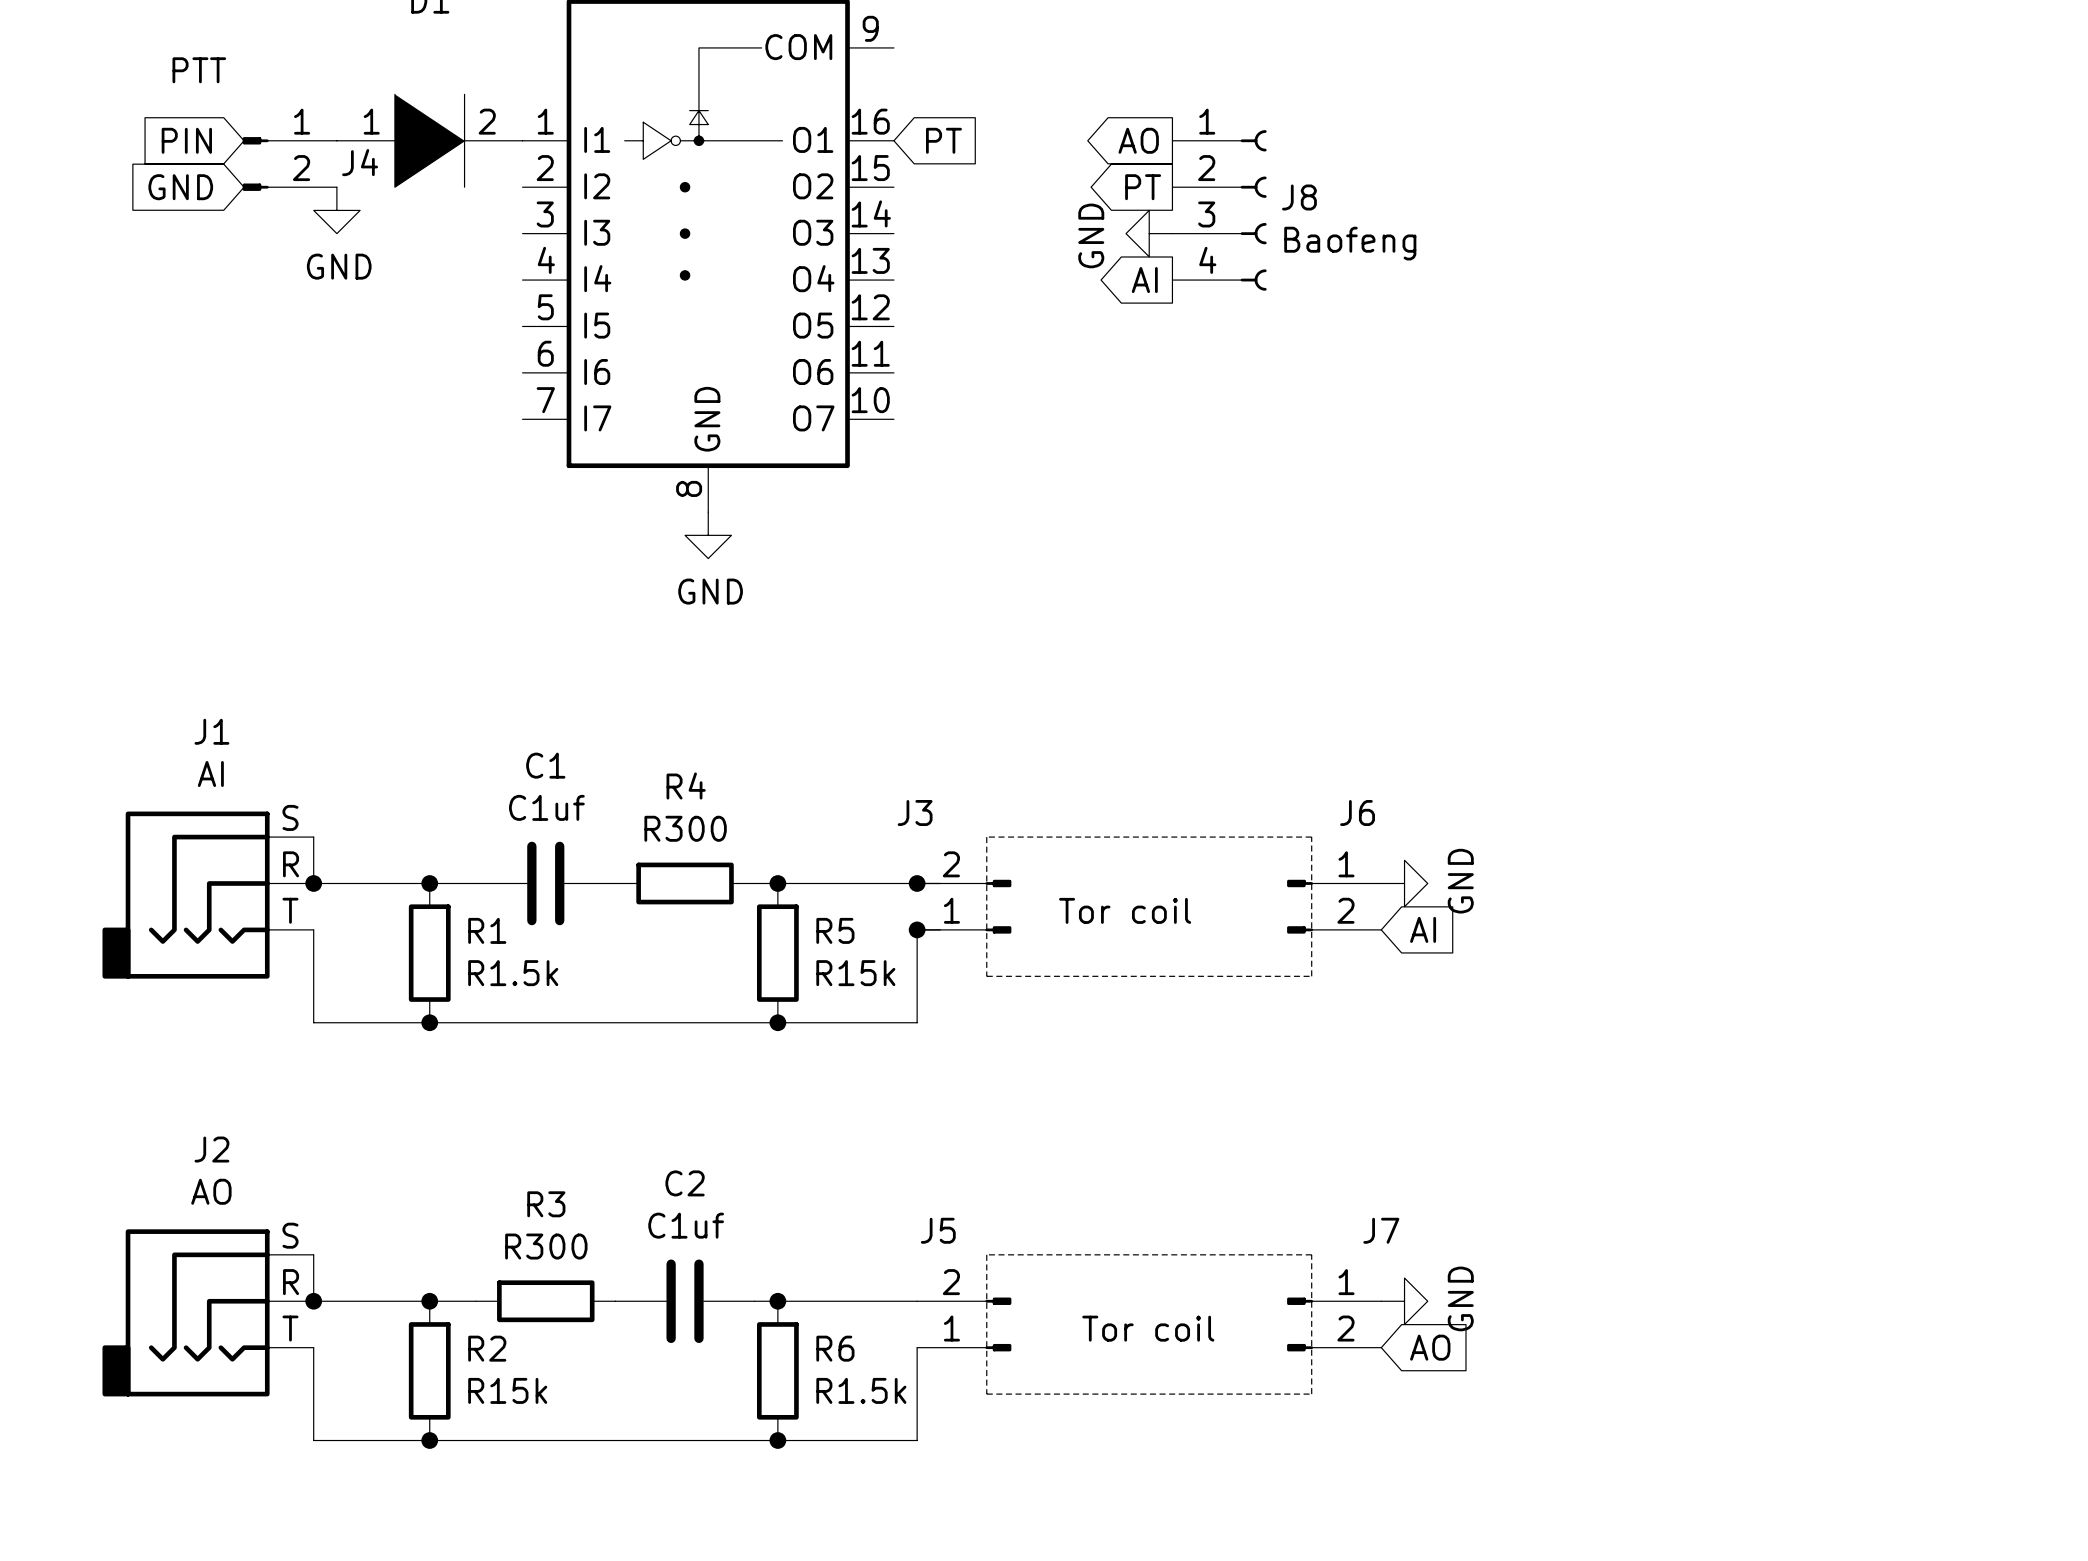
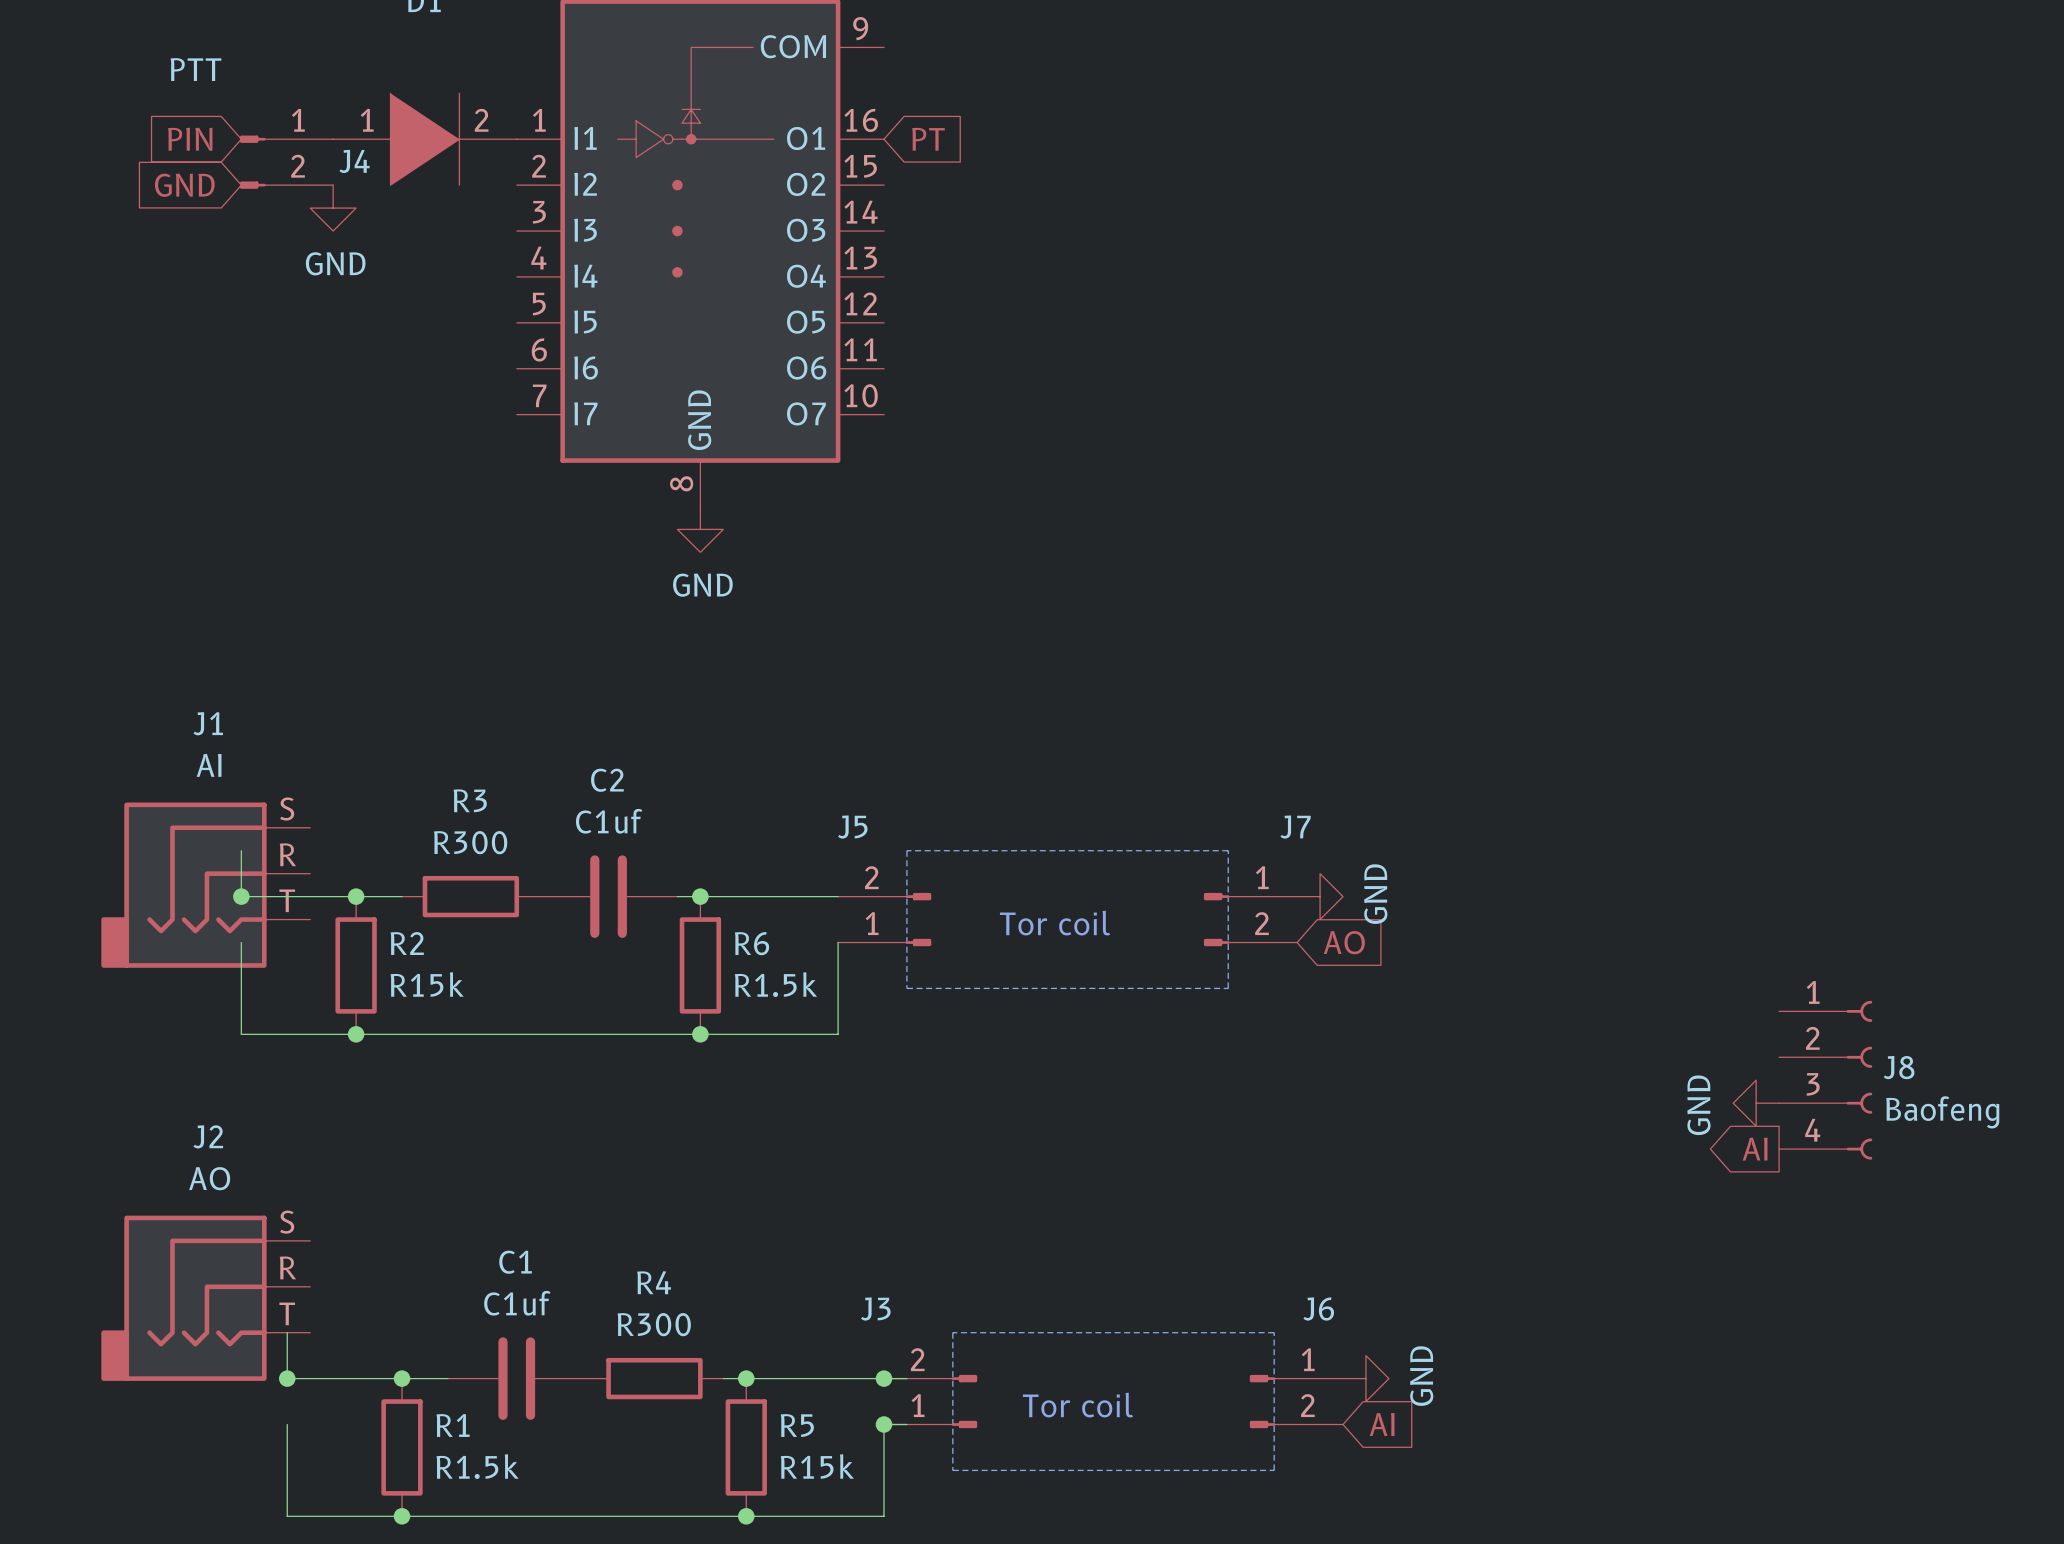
global label: AO (1138, 140) -> none
global label: PT (1143, 187) -> none
J8 position: (1219, 210) -> (1825, 1080)
power symbol: GND (1149, 233) -> none
global label: AI (1144, 280) -> none
wire: (313, 837) (313, 883) (476, 883) -> none
line: (986, 837) (986, 976) (1311, 976) (1311, 837) (986, 837) -> (906, 850) (906, 988) (1228, 988) (1228, 850) (906, 850)
junction: (313, 883) -> none
junction: (429, 883) -> none
C1 position: (545, 883) -> (516, 1378)
R4 position: (685, 883) -> (654, 1378)
wire: (754, 883) (940, 883) -> none
junction: (777, 883) -> none
junction: (917, 883) -> none
power symbol position: GND (1404, 883) -> GND (1320, 896)
junction: none -> (241, 896)
junction: none -> (356, 896)
junction: none -> (700, 896)
J3 position: (964, 906) -> (930, 1401)
J6 position: (1334, 906) -> (1296, 1401)
text position: Tor coil (1125, 910) -> Tor coil (1055, 923)
wire: (313, 929) (313, 1022) (917, 1022) (917, 929) (940, 929) -> none
junction: (917, 929) -> none
global label: AI (1423, 929) -> none
wire: none -> (241, 942) (241, 1034) (838, 1034) (838, 942)
R1 position: (429, 953) -> (402, 1447)
R5 position: (777, 953) -> (746, 1447)
junction: (429, 1022) -> none
junction: (777, 1022) -> none
junction: none -> (356, 1034)
junction: none -> (700, 1034)
power symbol: none -> GND (1756, 1103)
global label: none -> AI (1755, 1149)
wire: (313, 1254) (313, 1301) (476, 1301) -> (241, 850) (241, 896) (402, 896)
line: (986, 1254) (1311, 1254) (1311, 1394) (986, 1394) (986, 1254) -> (952, 1332) (1274, 1332) (1274, 1470) (952, 1470) (952, 1332)
junction: (313, 1301) -> none
junction: (429, 1301) -> none
R3 position: (545, 1301) -> (470, 896)
C2 position: (685, 1301) -> (608, 896)
wire: (754, 1301) (917, 1301) -> (677, 896) (838, 896)
junction: (777, 1301) -> none
power symbol position: GND (1404, 1301) -> GND (1365, 1378)
J5 position: (964, 1324) -> (884, 919)
J7 position: (1334, 1324) -> (1250, 919)
text position: Tor coil (1148, 1328) -> Tor coil (1077, 1405)
wire: none -> (287, 1332) (287, 1378) (447, 1378)
wire: (313, 1347) (313, 1440) (893, 1440) -> (287, 1424) (287, 1516) (883, 1516) (883, 1424)
wire: (917, 1347) (917, 1440) -> none
global label position: AO (1430, 1347) -> AO (1344, 942)
R2 position: (429, 1370) -> (356, 965)
R6 position: (777, 1370) -> (700, 965)
junction: none -> (287, 1378)
junction: none -> (402, 1378)
wire: none -> (723, 1378) (906, 1378)
junction: none -> (746, 1378)
junction: none -> (883, 1378)
junction: (429, 1440) -> none
junction: (777, 1440) -> none
junction: none -> (883, 1424)
global label: none -> AI (1382, 1424)
junction: none -> (402, 1516)
junction: none -> (746, 1516)

